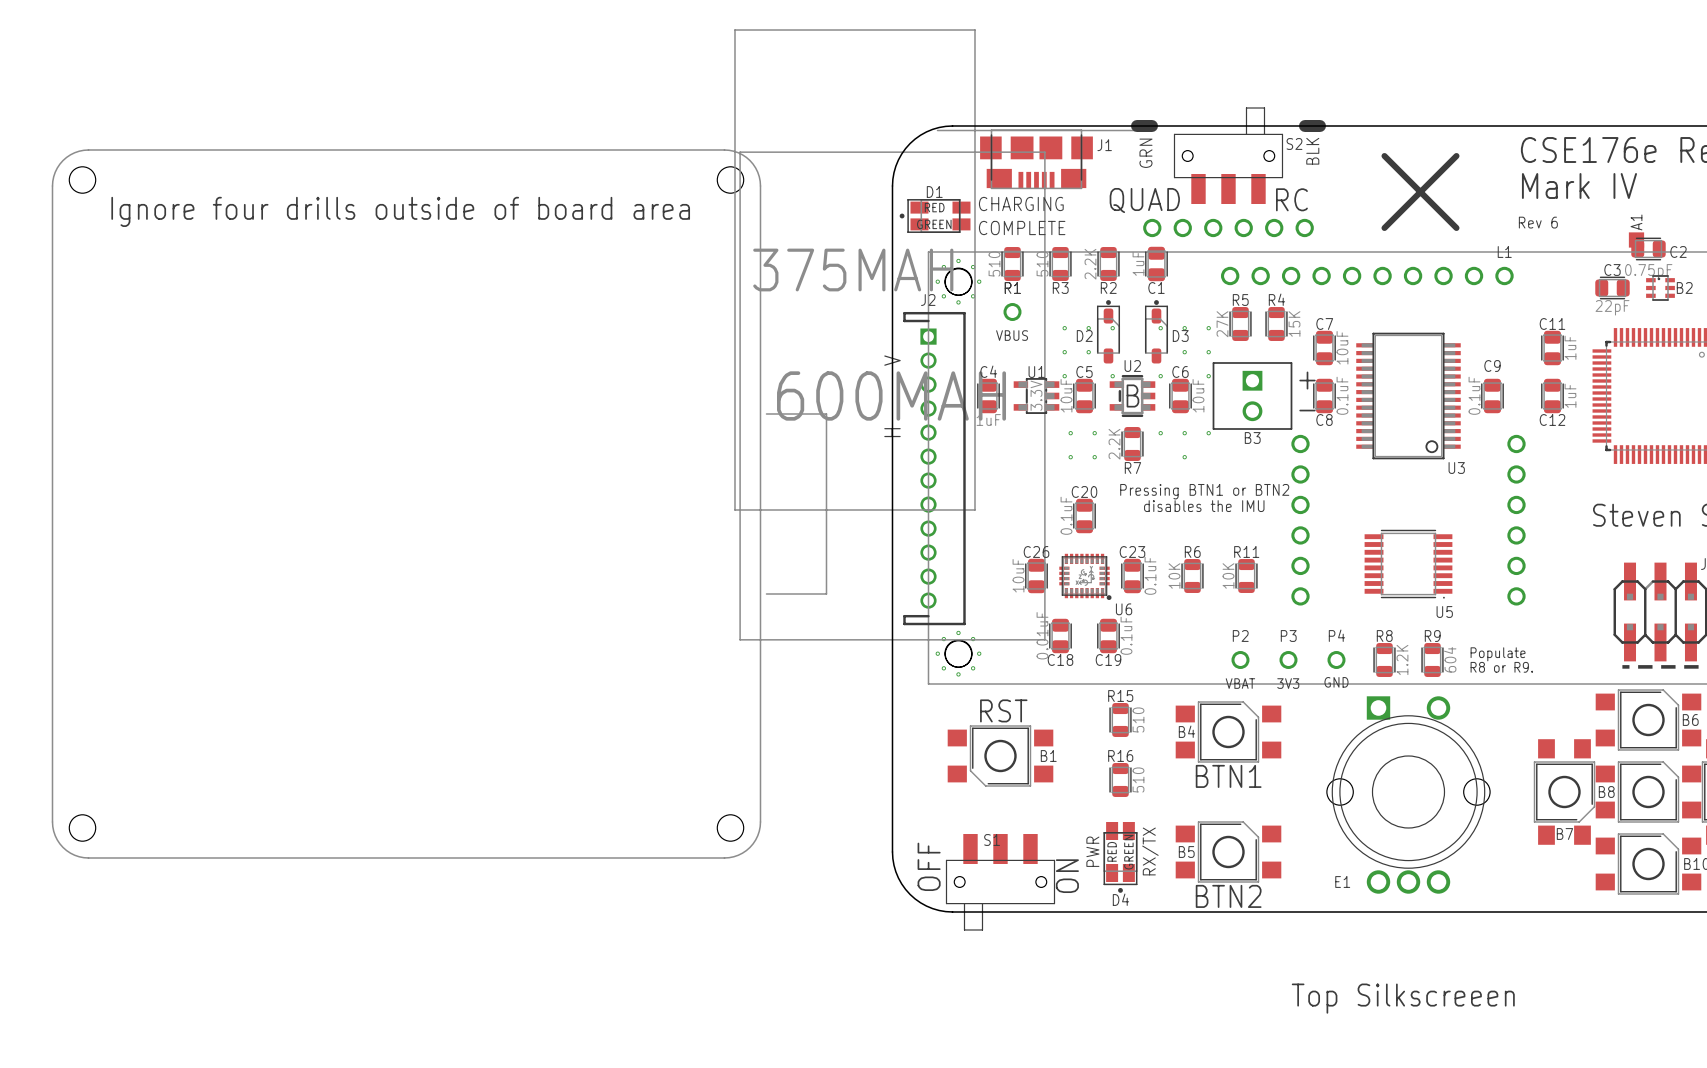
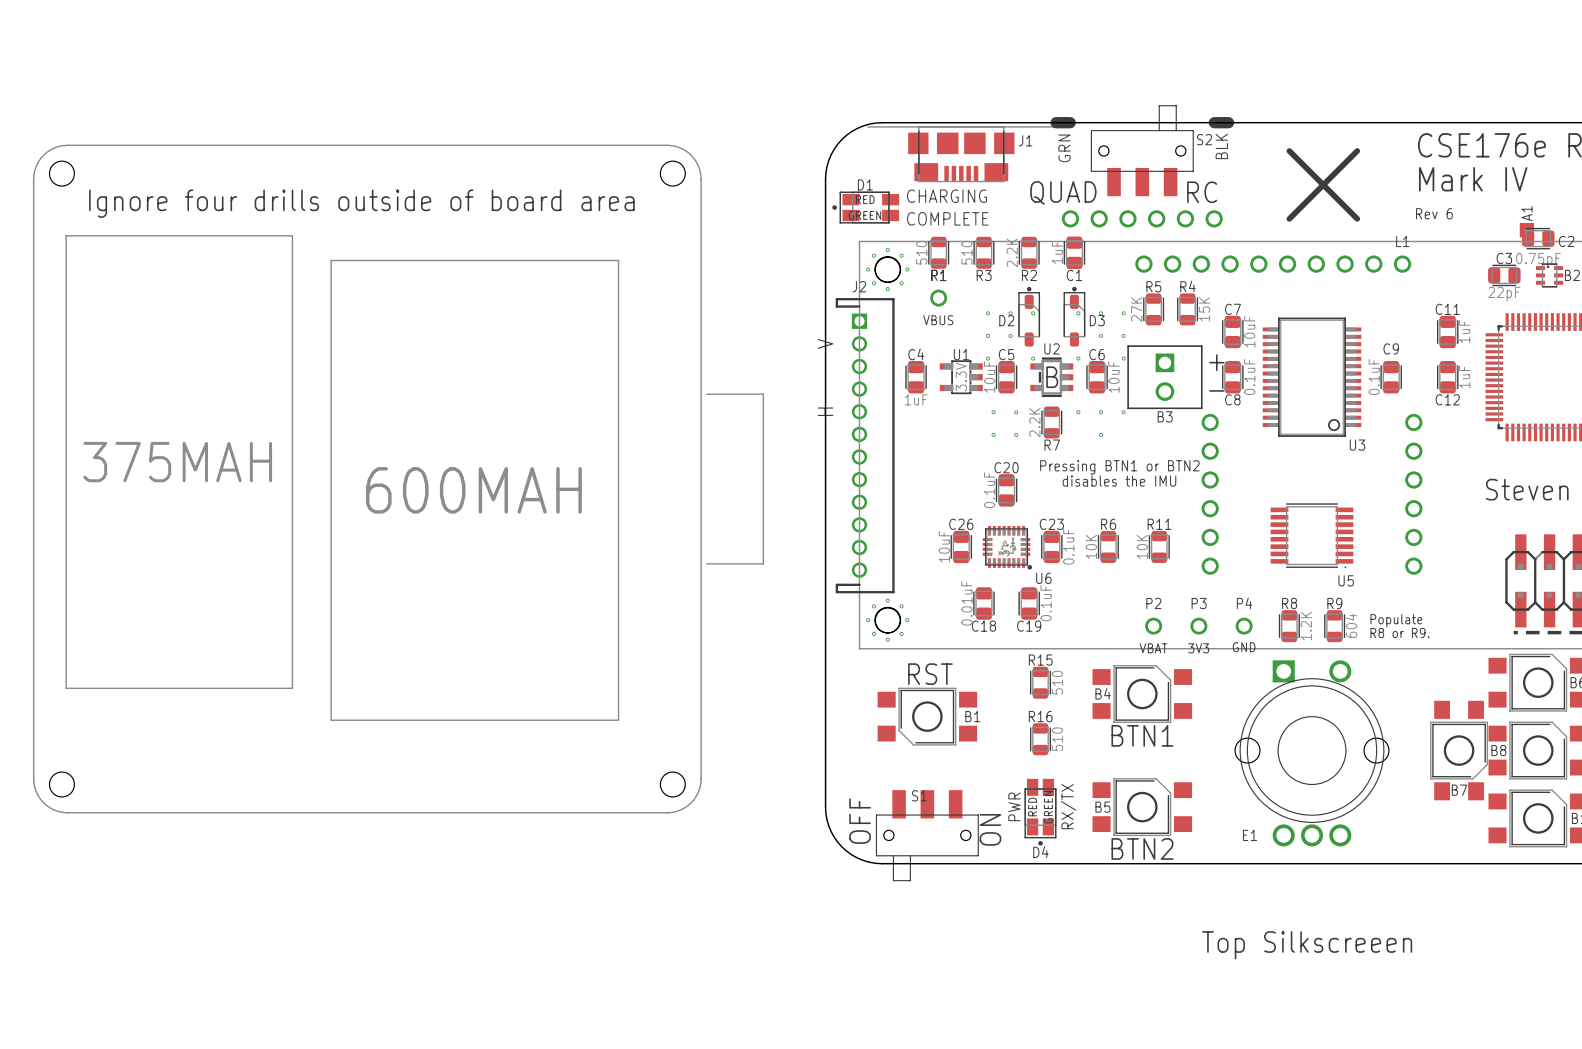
drawing: [734, 29, 1046, 641] -> none
drawing: none -> [65, 235, 294, 690]
drawing: none -> [330, 259, 620, 721]

